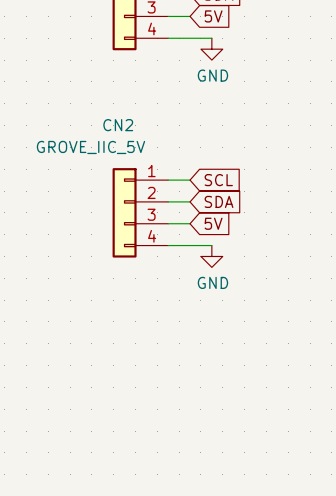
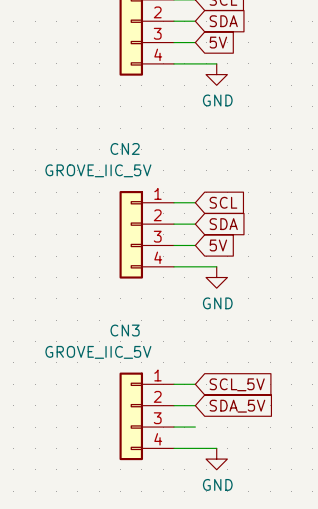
wire: none -> (173, 384) (195, 384)
global label: none -> SCL_5V (237, 384)
wire: none -> (173, 405) (195, 405)
global label: none -> SDA_5V (237, 406)
CN3: none -> GROVE_IIC_5V (146, 416)
wire: none -> (173, 427) (195, 427)
wire: none -> (173, 448) (216, 448)
power symbol: none -> GND (216, 459)

